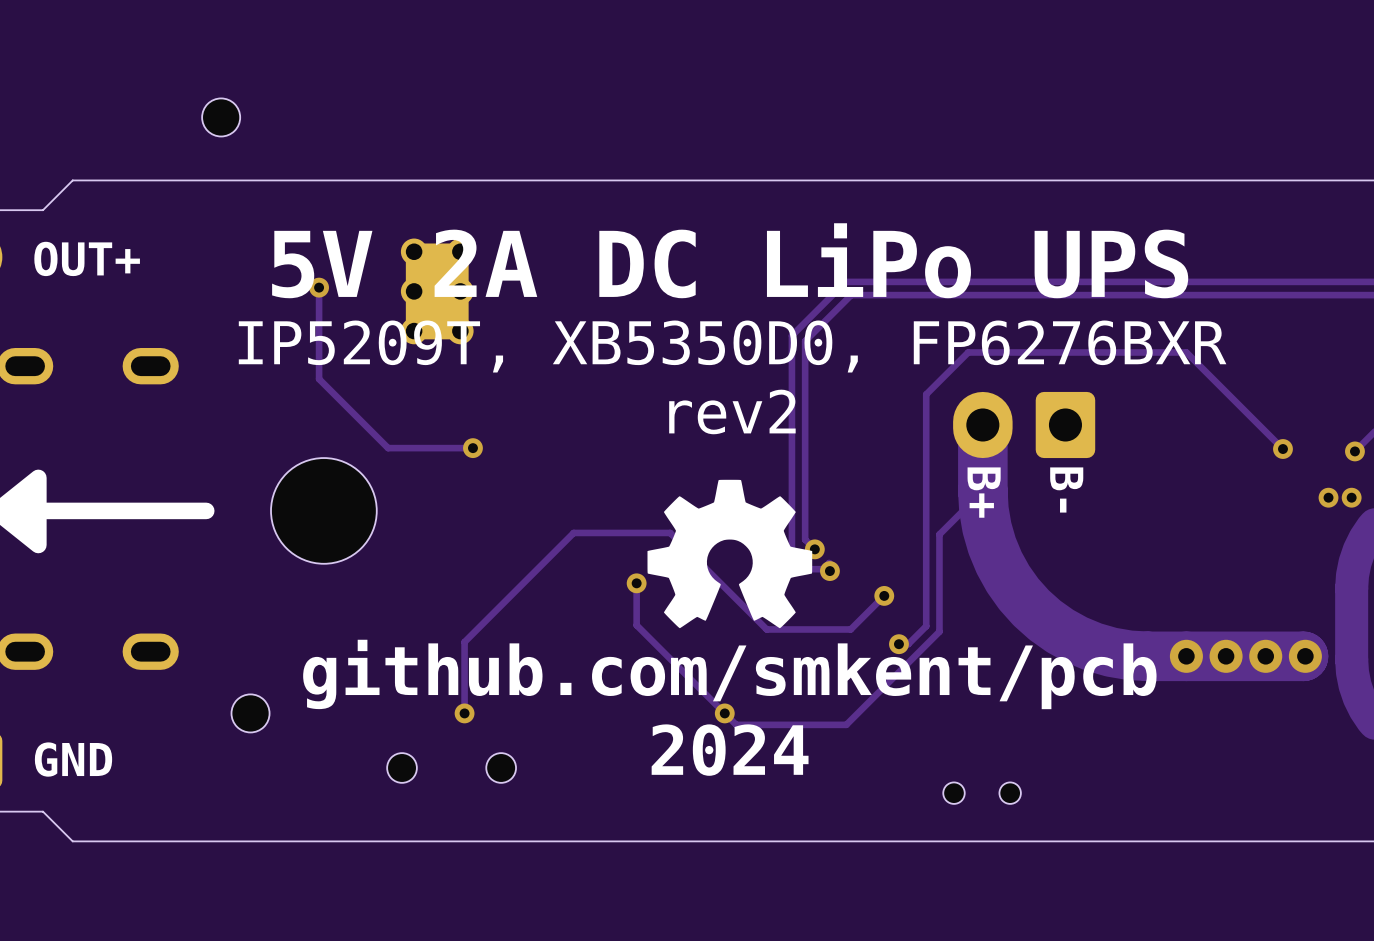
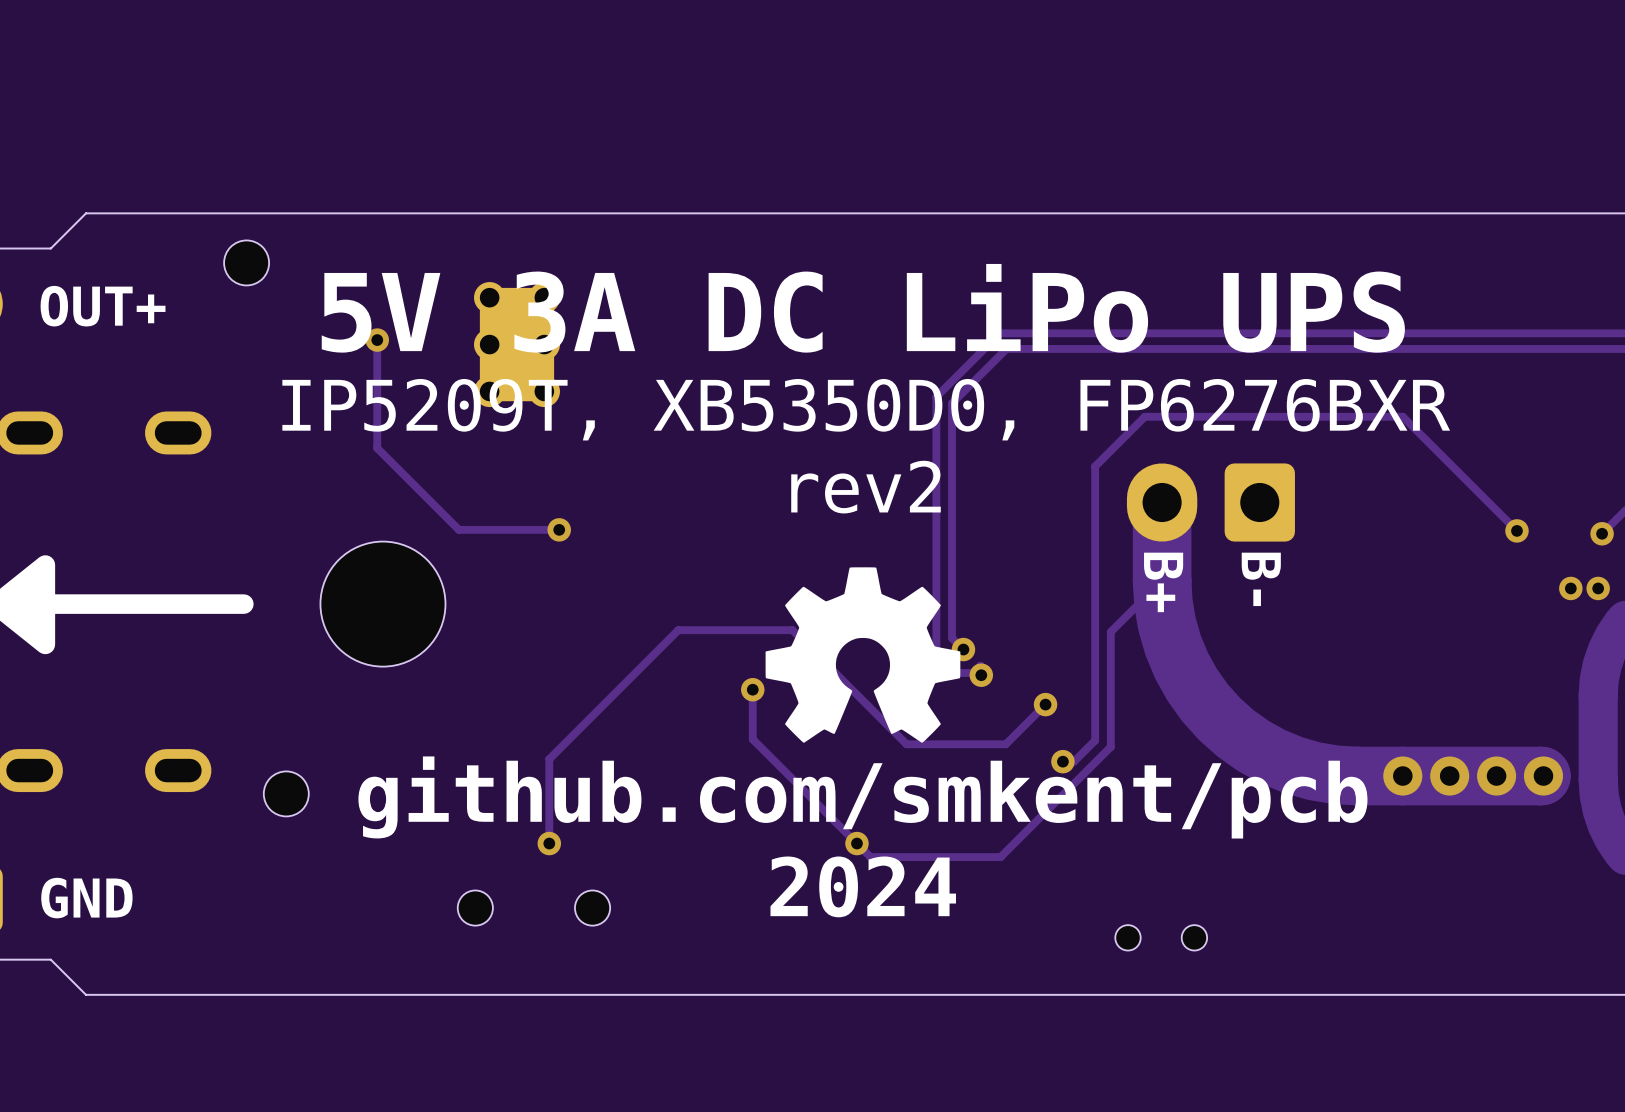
part position: (221, 117) -> (246, 262)
text: 5V 2A DC LiPo UPS (730, 260) -> 5V 3A DC LiPo UPS (863, 308)
part position: (250, 713) -> (286, 793)

